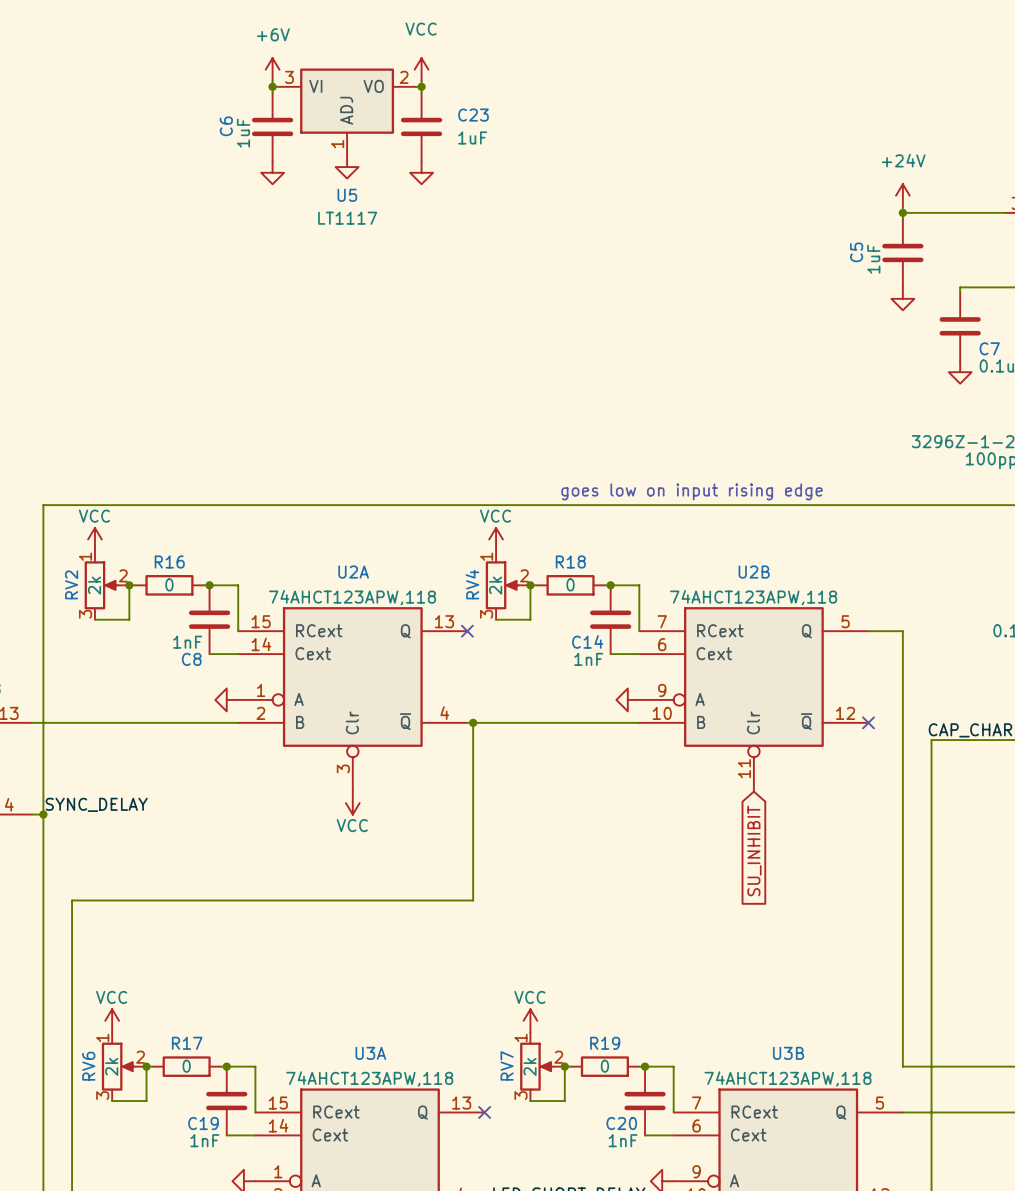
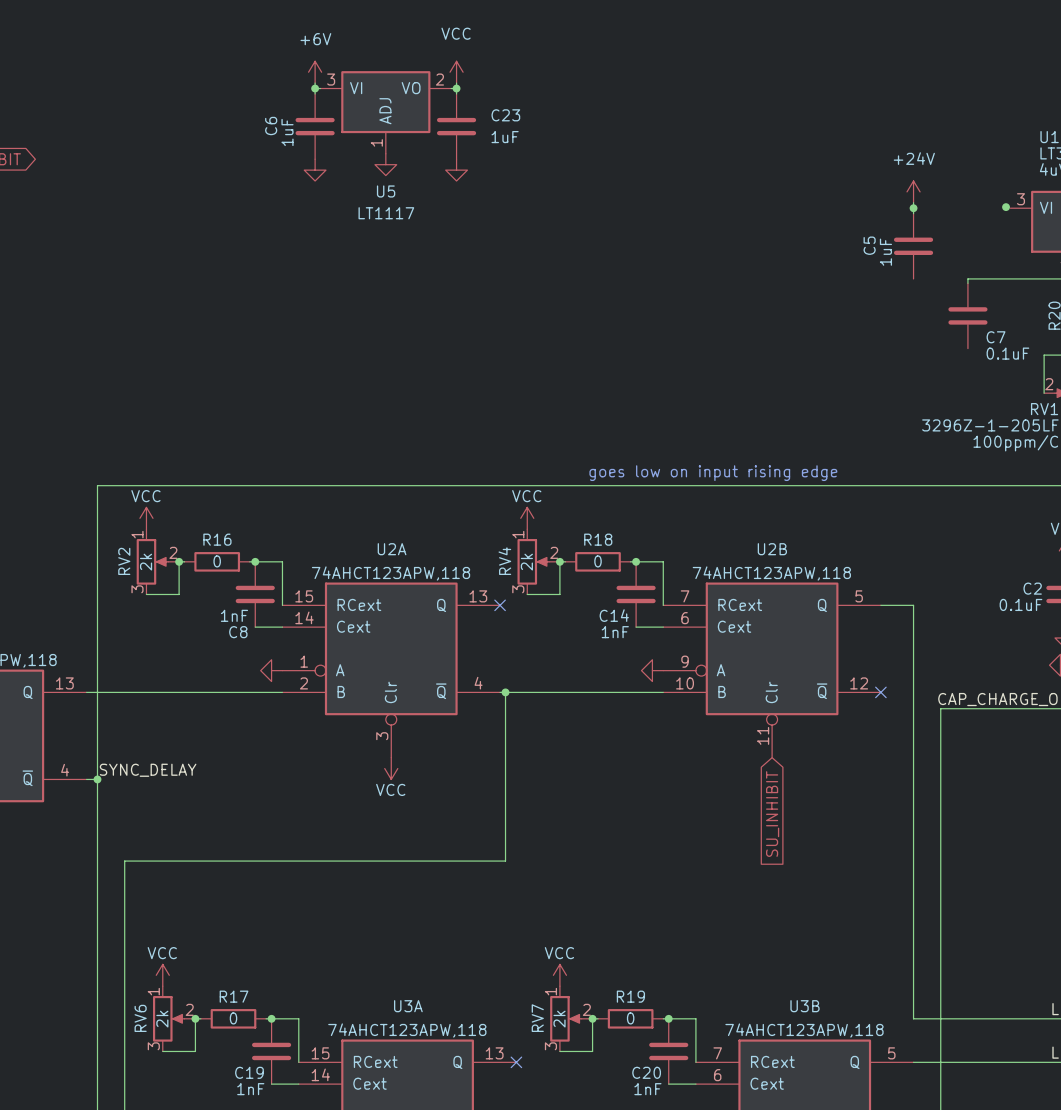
junction: none -> (1006, 207)
wire: (902, 212) (1004, 212) -> none
power symbol: (902, 298) -> none
power symbol: (960, 372) -> none

